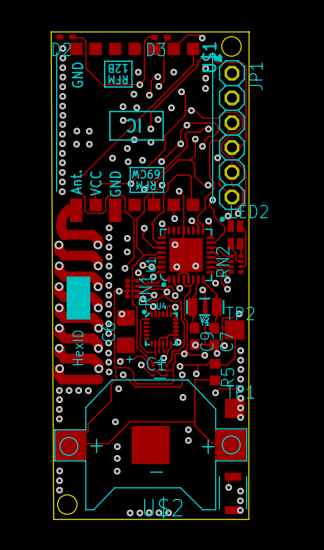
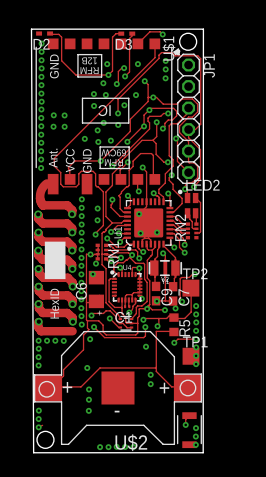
via: none -> (95, 263)

